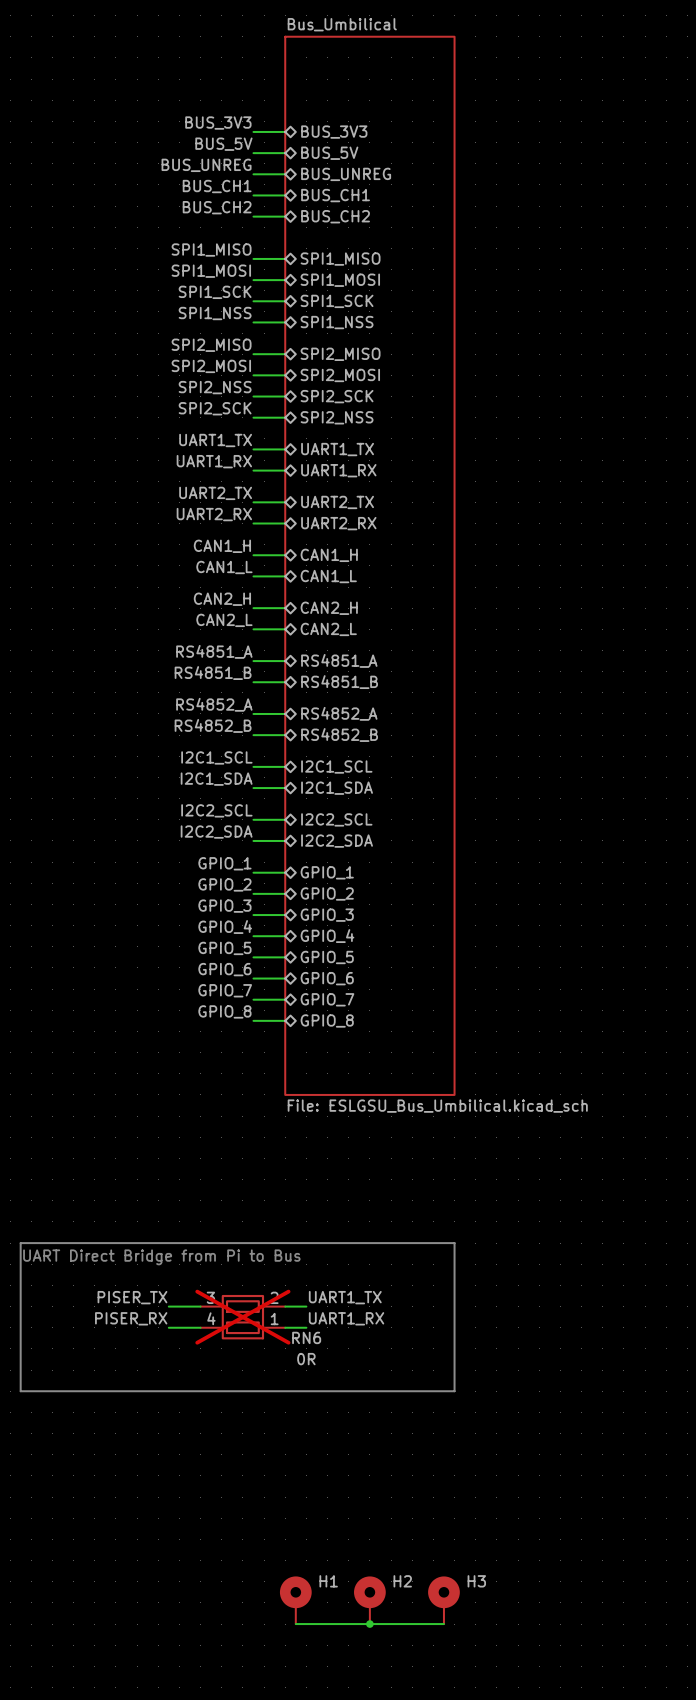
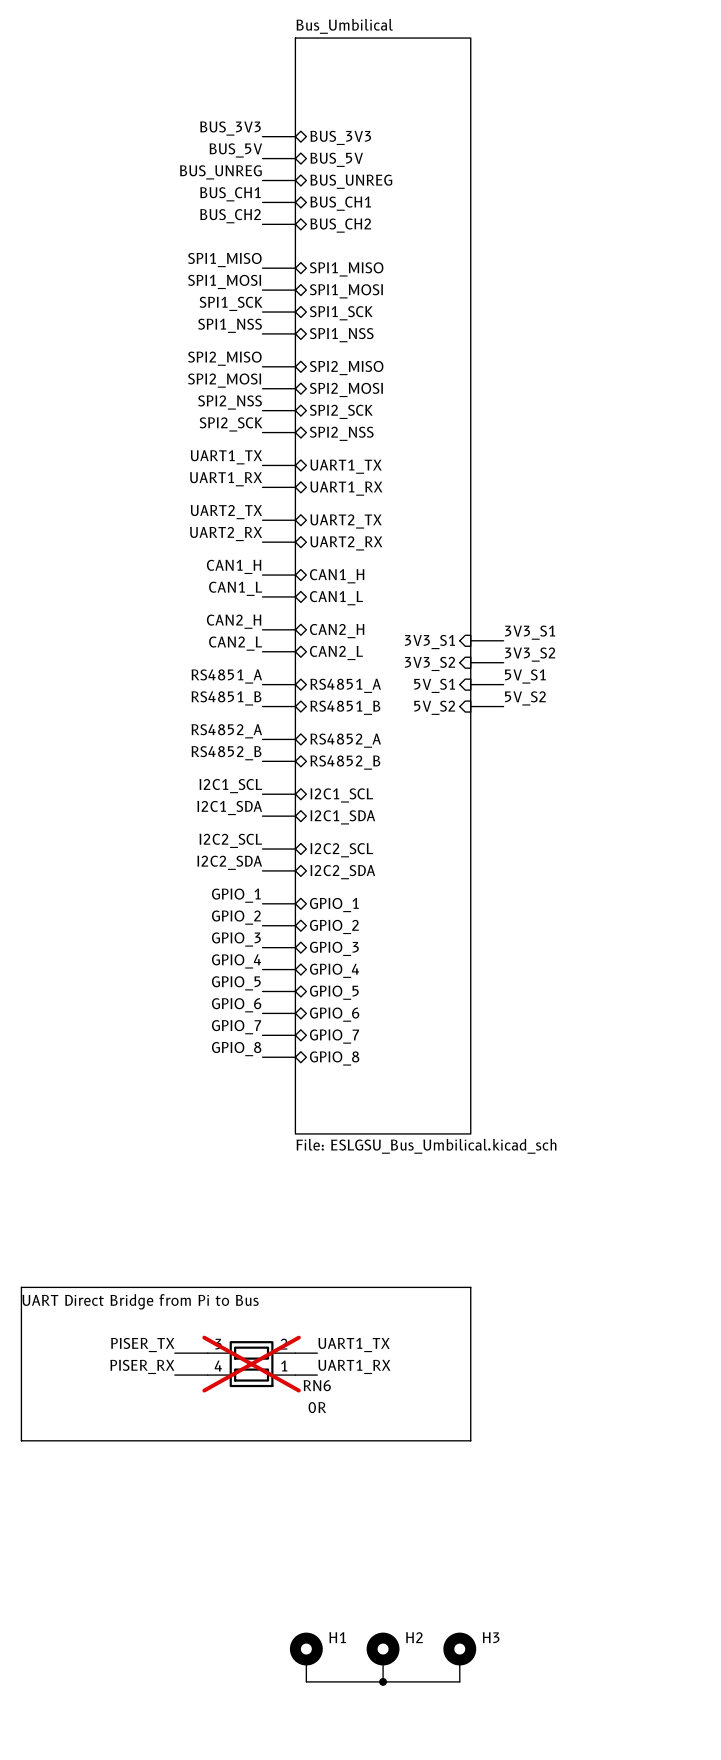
label: none -> 3V3_S1 (530, 632)
sheet pin: none -> 3V3_S1 (429, 642)
wire: none -> (470, 640) (503, 640)
label: none -> 3V3_S2 (530, 654)
wire: none -> (470, 662) (503, 662)
sheet pin: none -> 3V3_S2 (429, 663)
label: none -> 5V_S1 (525, 676)
sheet pin: none -> 5V_S1 (434, 685)
wire: none -> (470, 684) (503, 684)
label: none -> 5V_S2 (525, 698)
sheet pin: none -> 5V_S2 (434, 707)
wire: none -> (470, 706) (503, 706)

